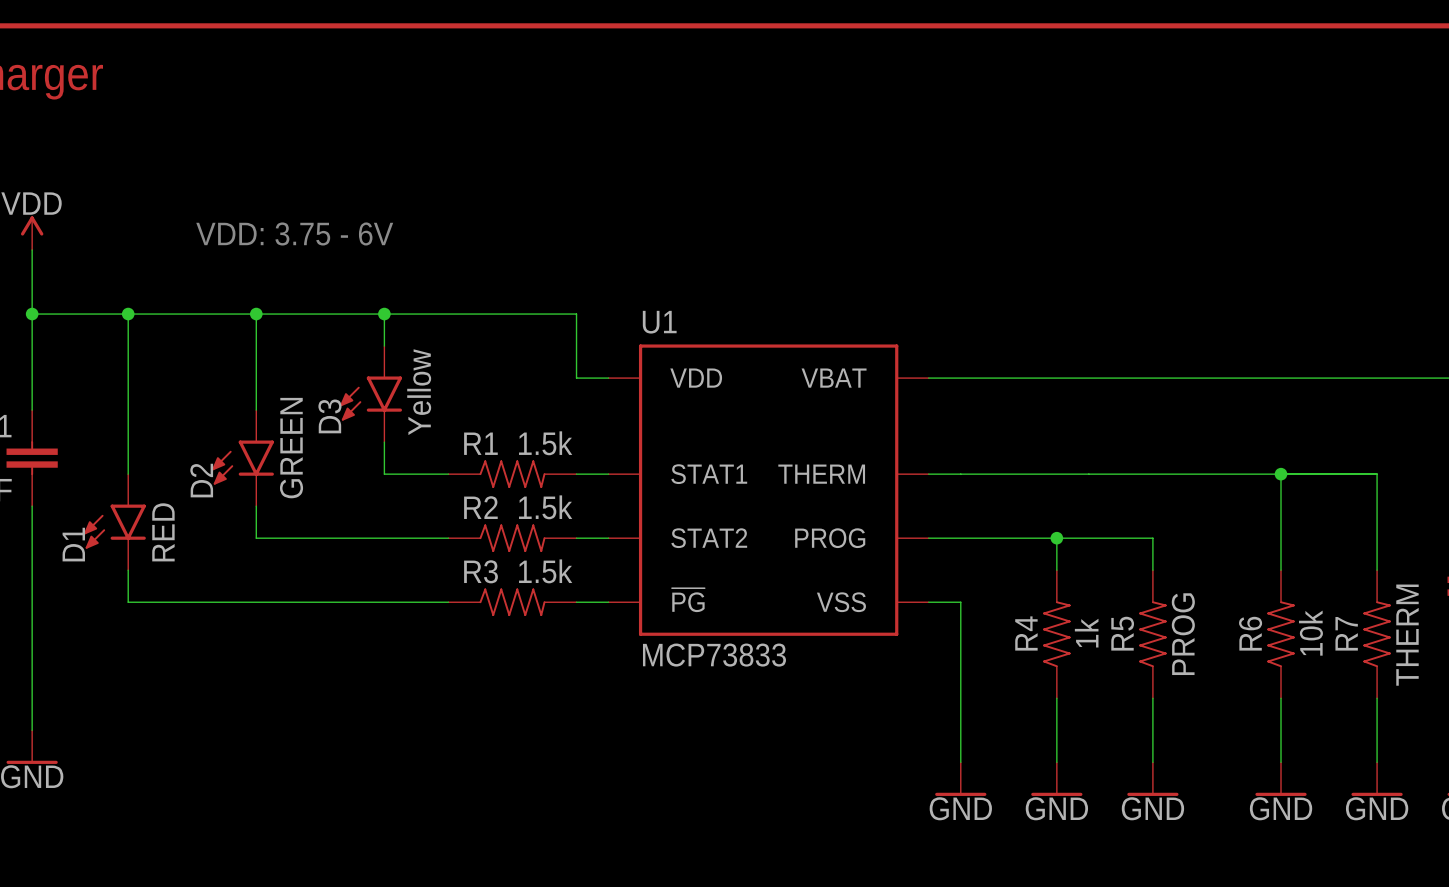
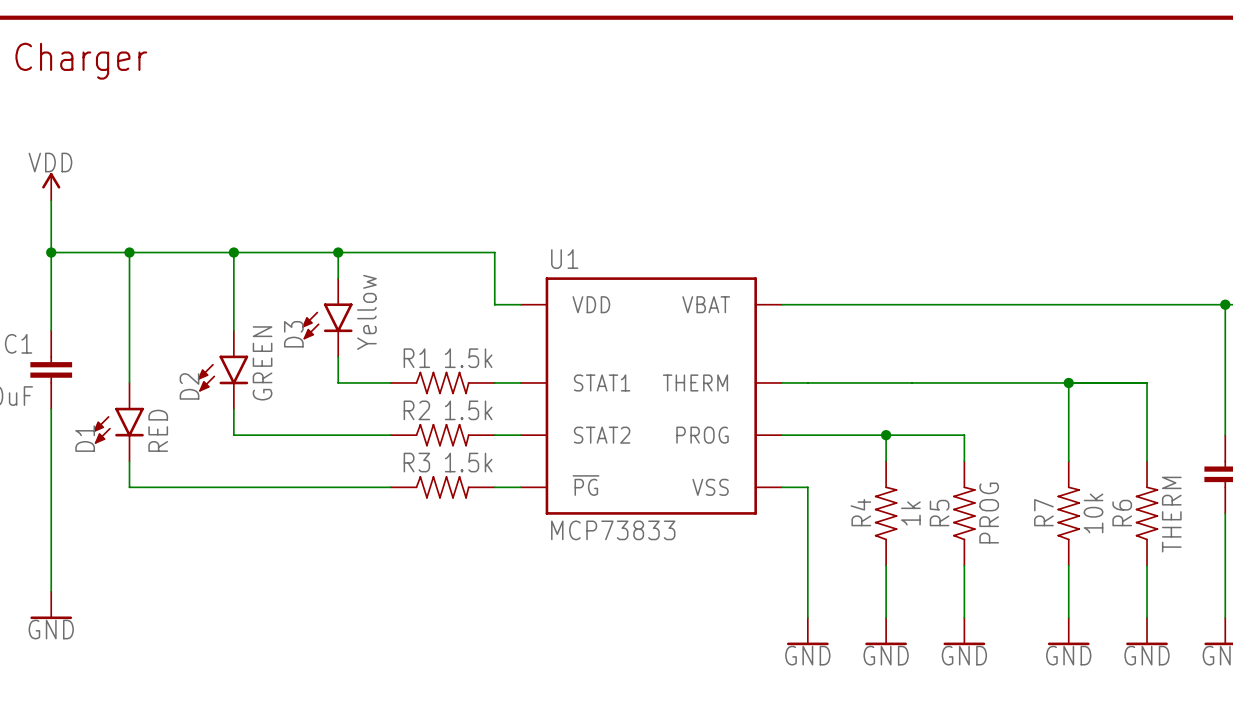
text: VDD: 3.75 - 6V (294, 233) -> none
R6 name: R6 (1250, 633) -> R7 (1043, 512)
R7 name: R7 (1346, 633) -> R6 (1122, 513)

